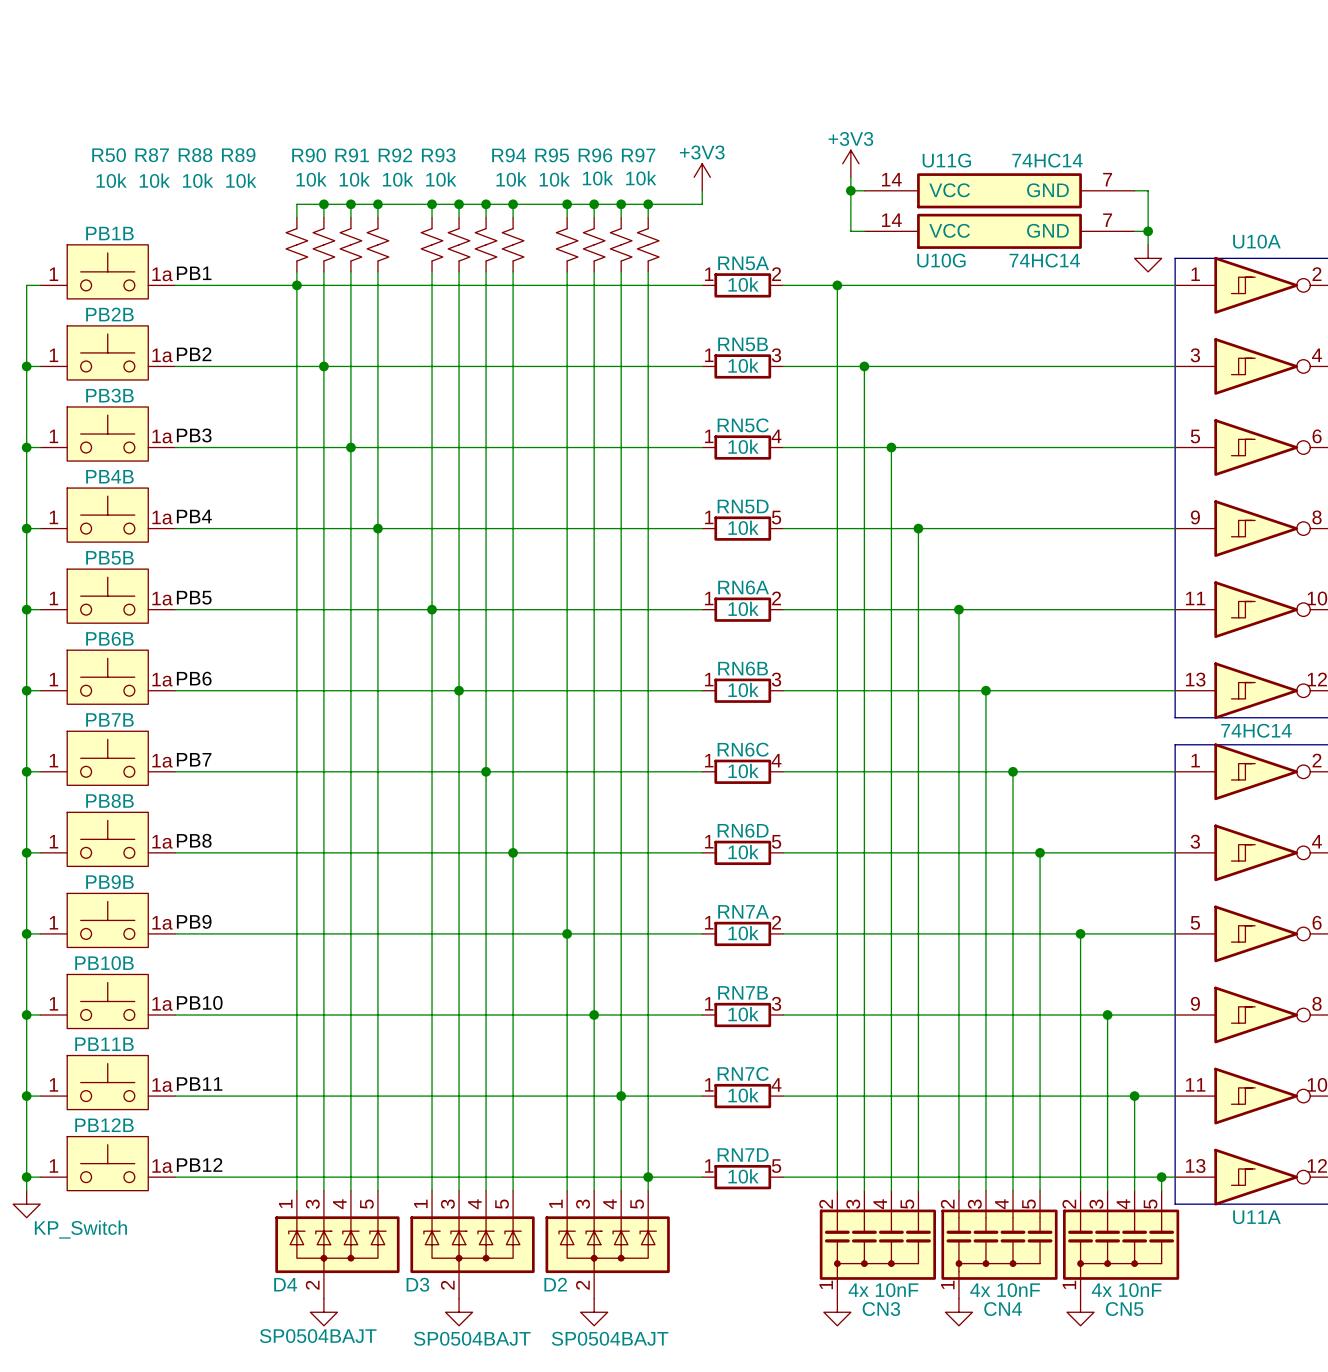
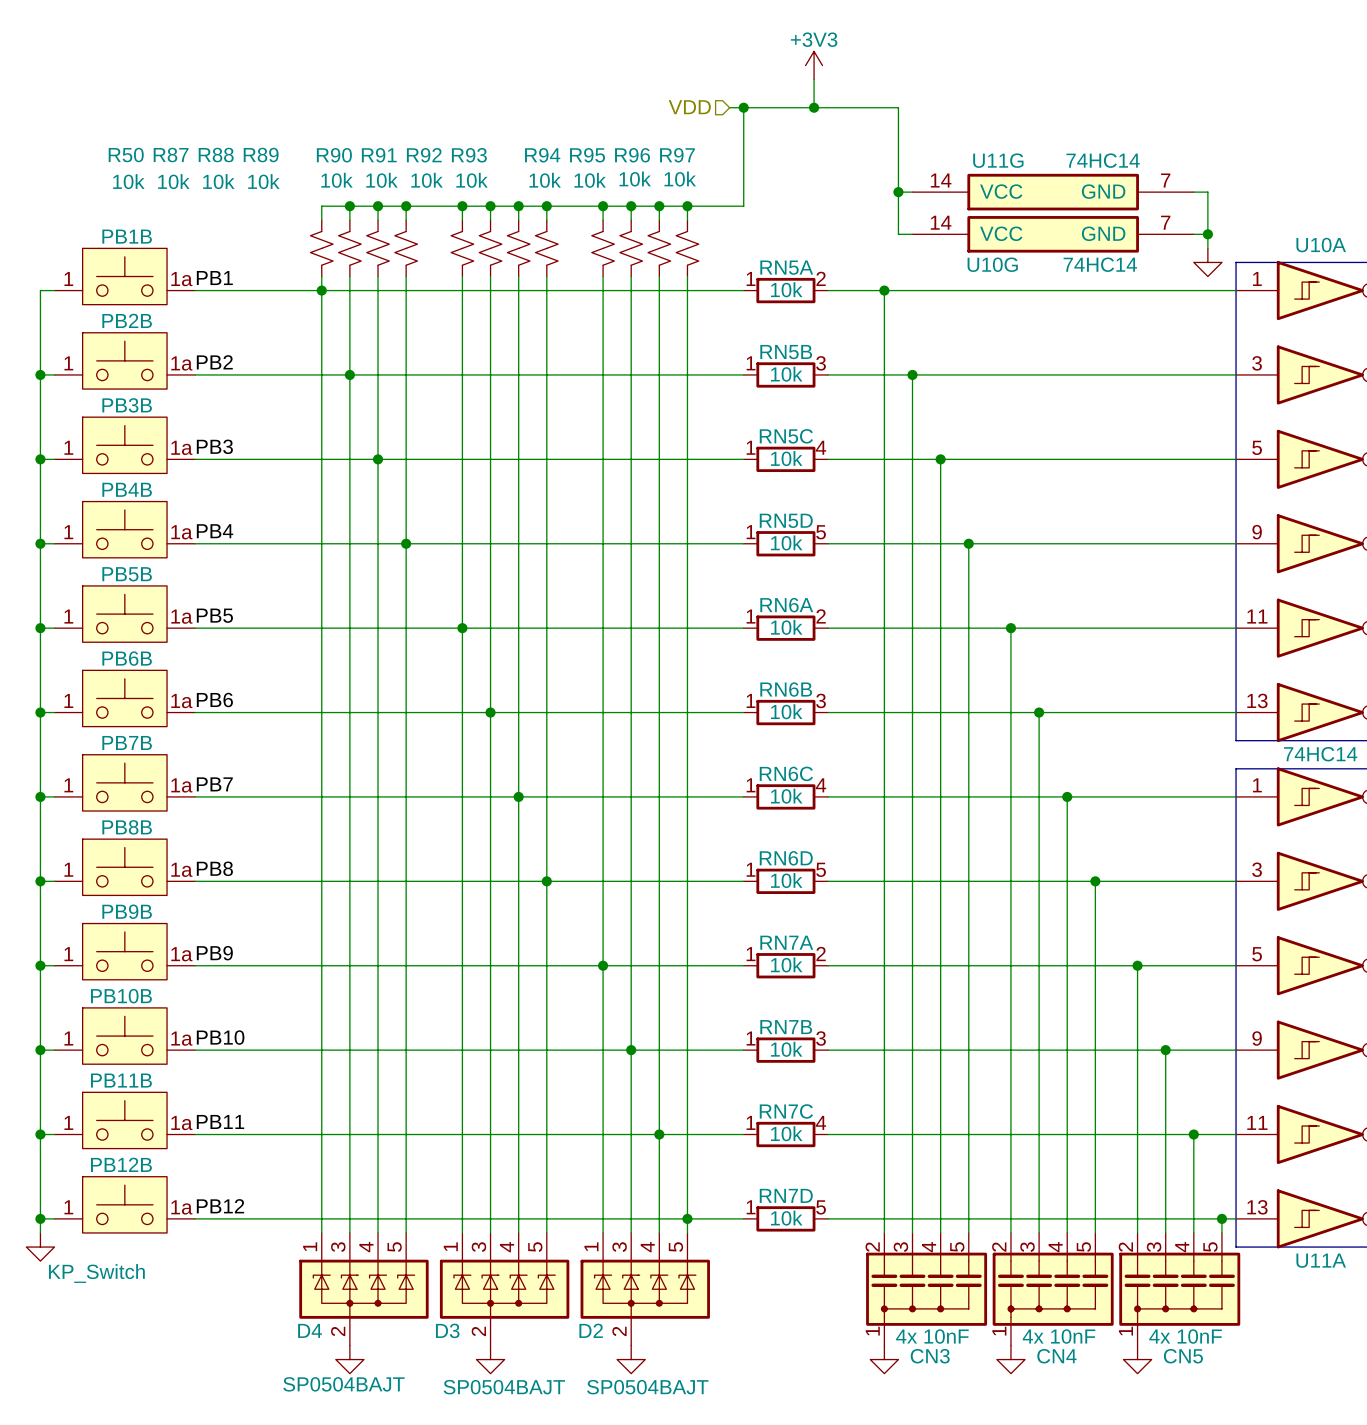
power symbol: none -> +3V3 (814, 65)
wire: none -> (814, 79) (814, 107)
hierarchical label: none -> VDD (689, 107)
wire: none -> (729, 107) (898, 107) (898, 178)
wire: none -> (743, 107) (743, 192)
junction: none -> (743, 107)
junction: none -> (814, 107)
power symbol: +3V3 (850, 163) -> none
power symbol: +3V3 (702, 177) -> none

